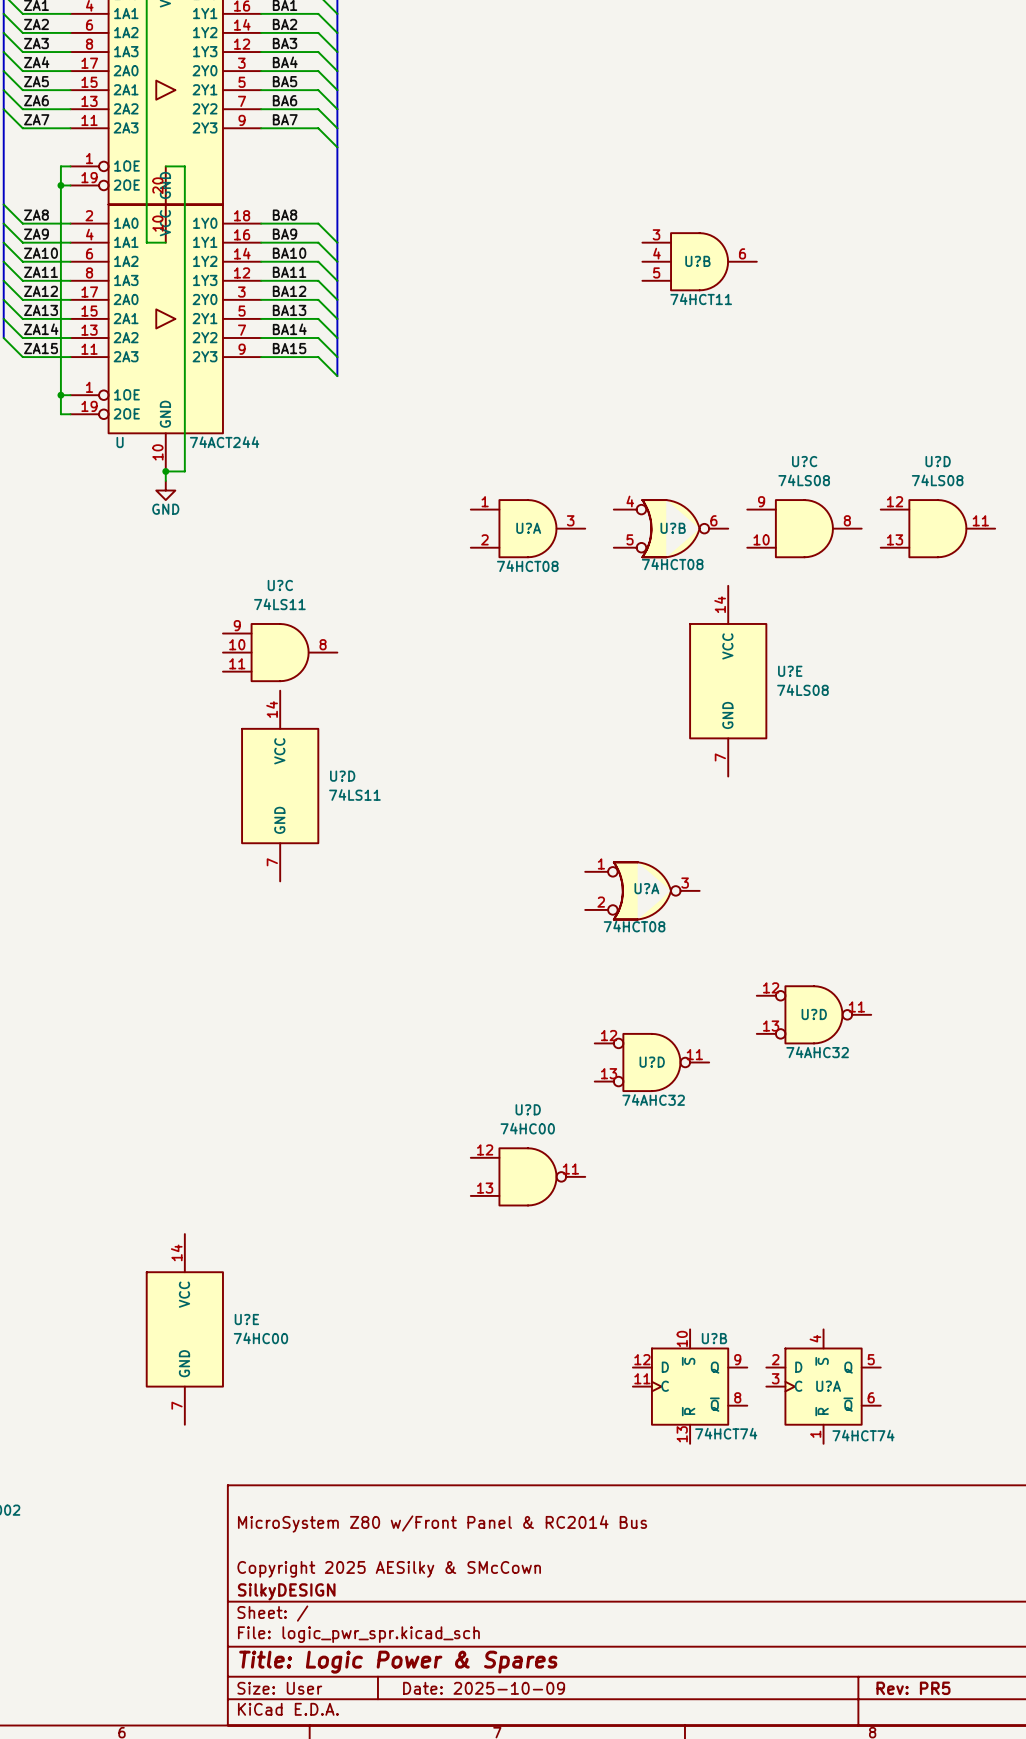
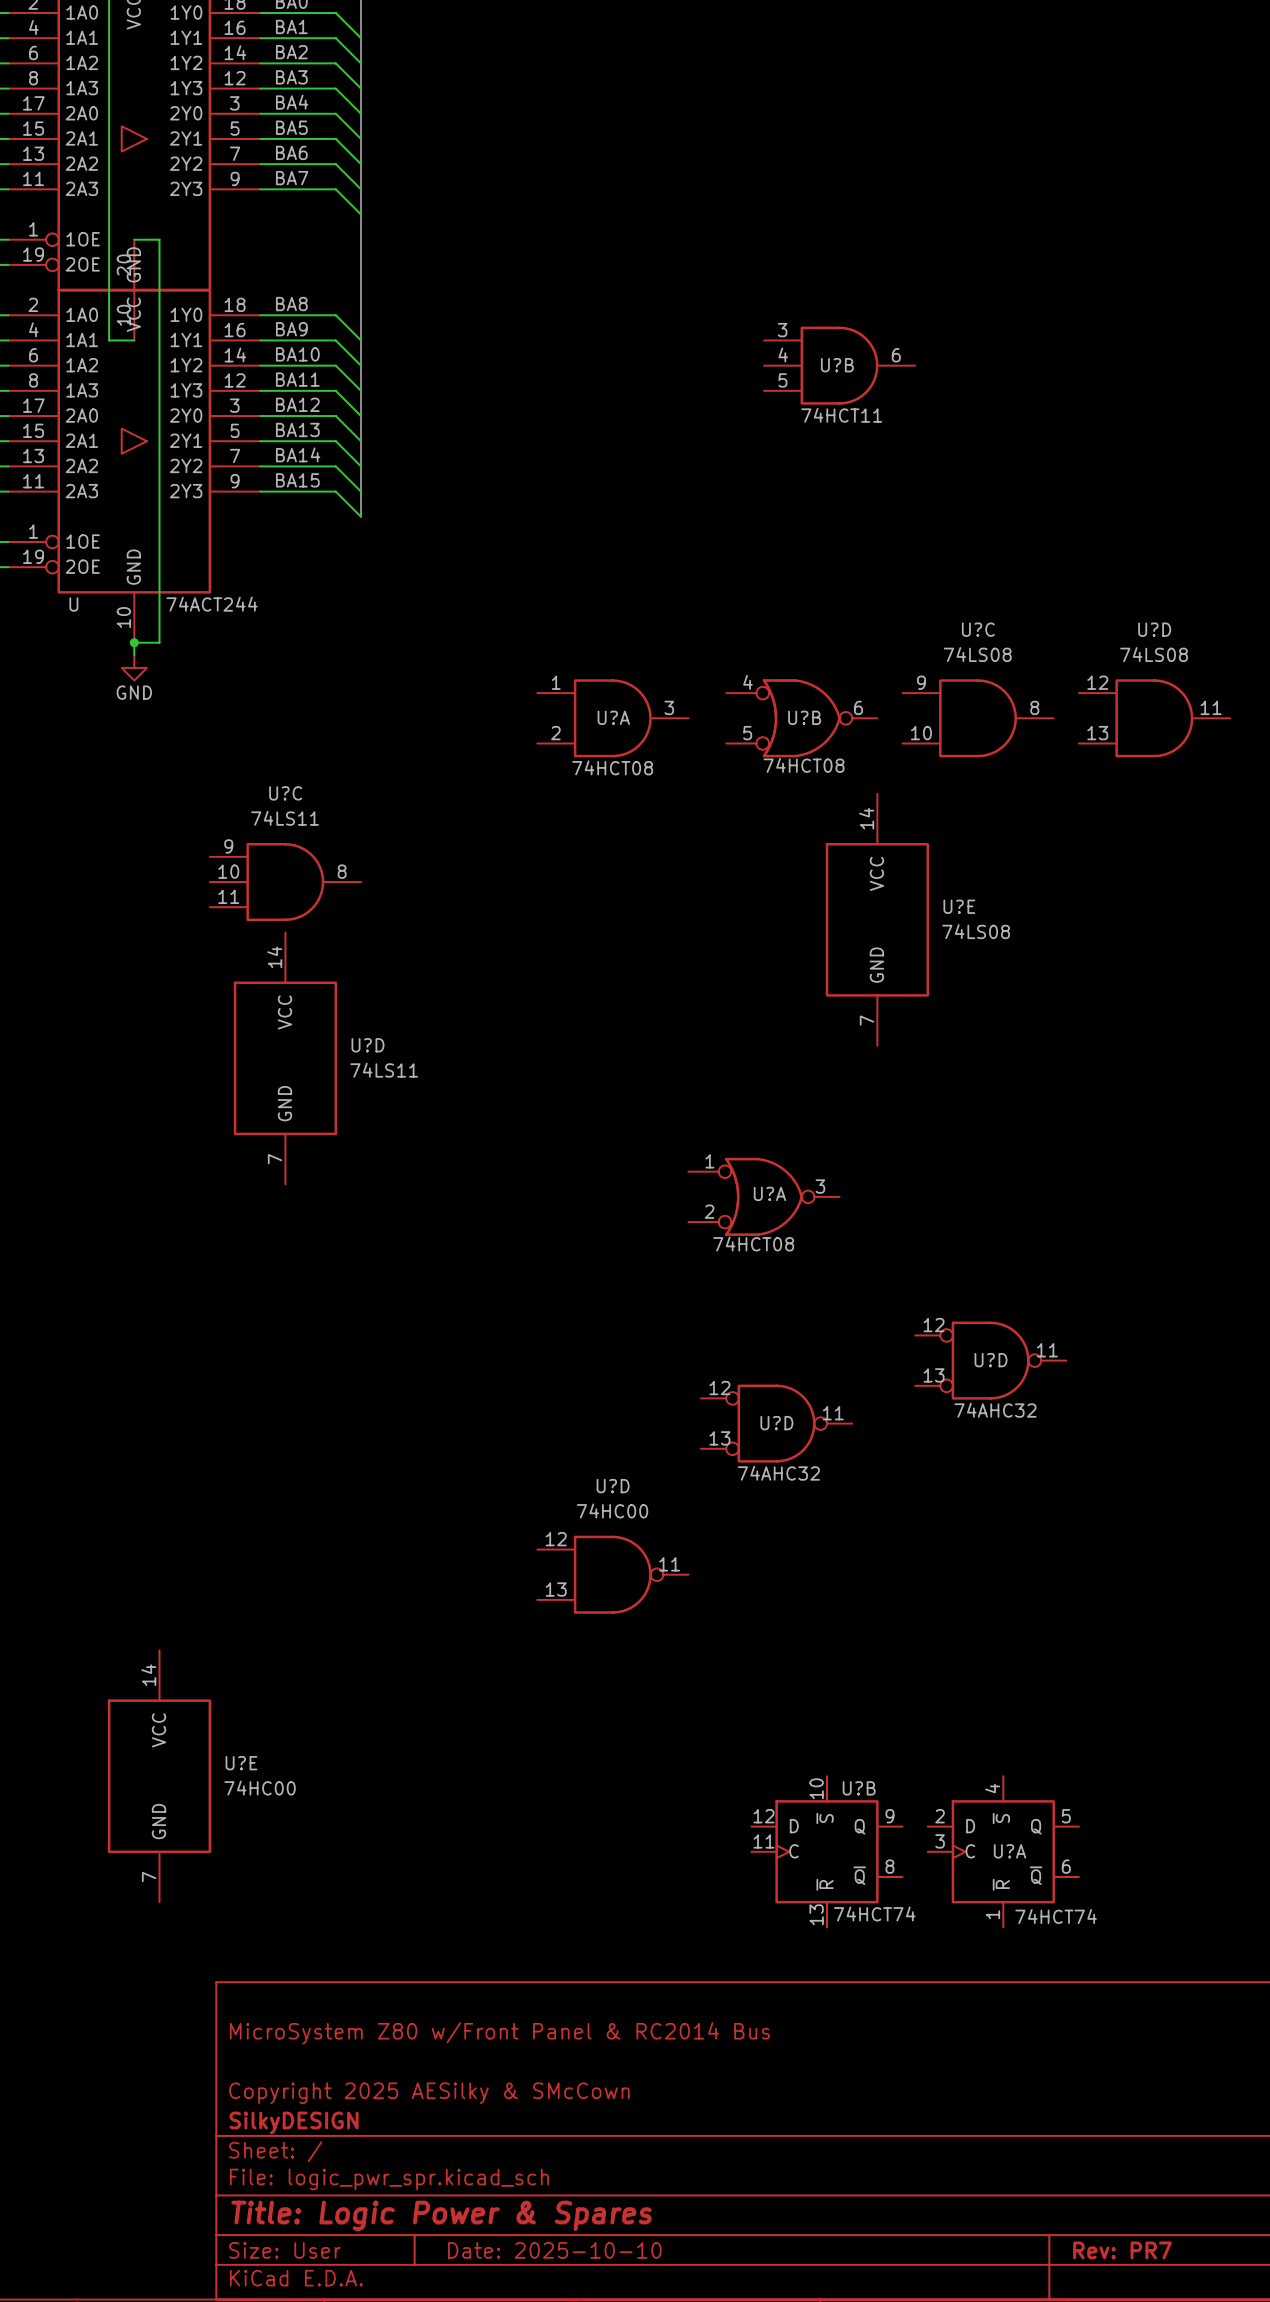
title block: Date: 2025-10-09 (484, 1688) -> Date: 2025-10-10 (554, 2250)
title block: Rev: PR5 (913, 1688) -> Rev: PR7 (1122, 2250)

